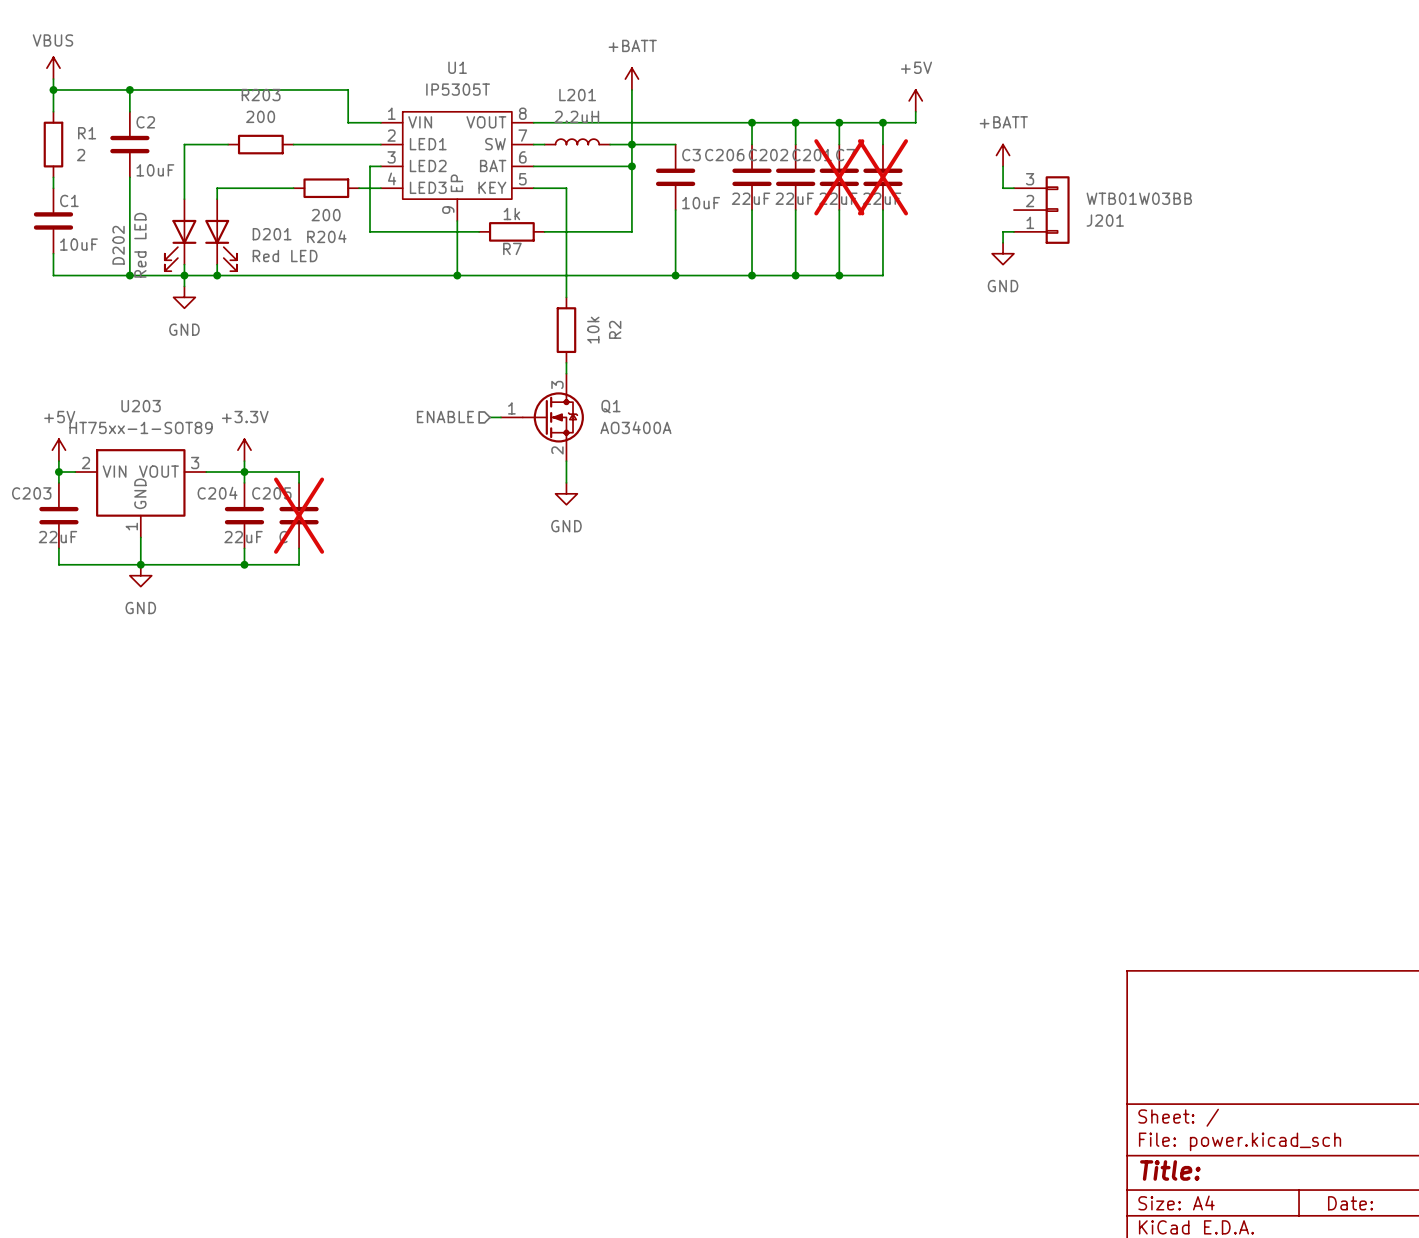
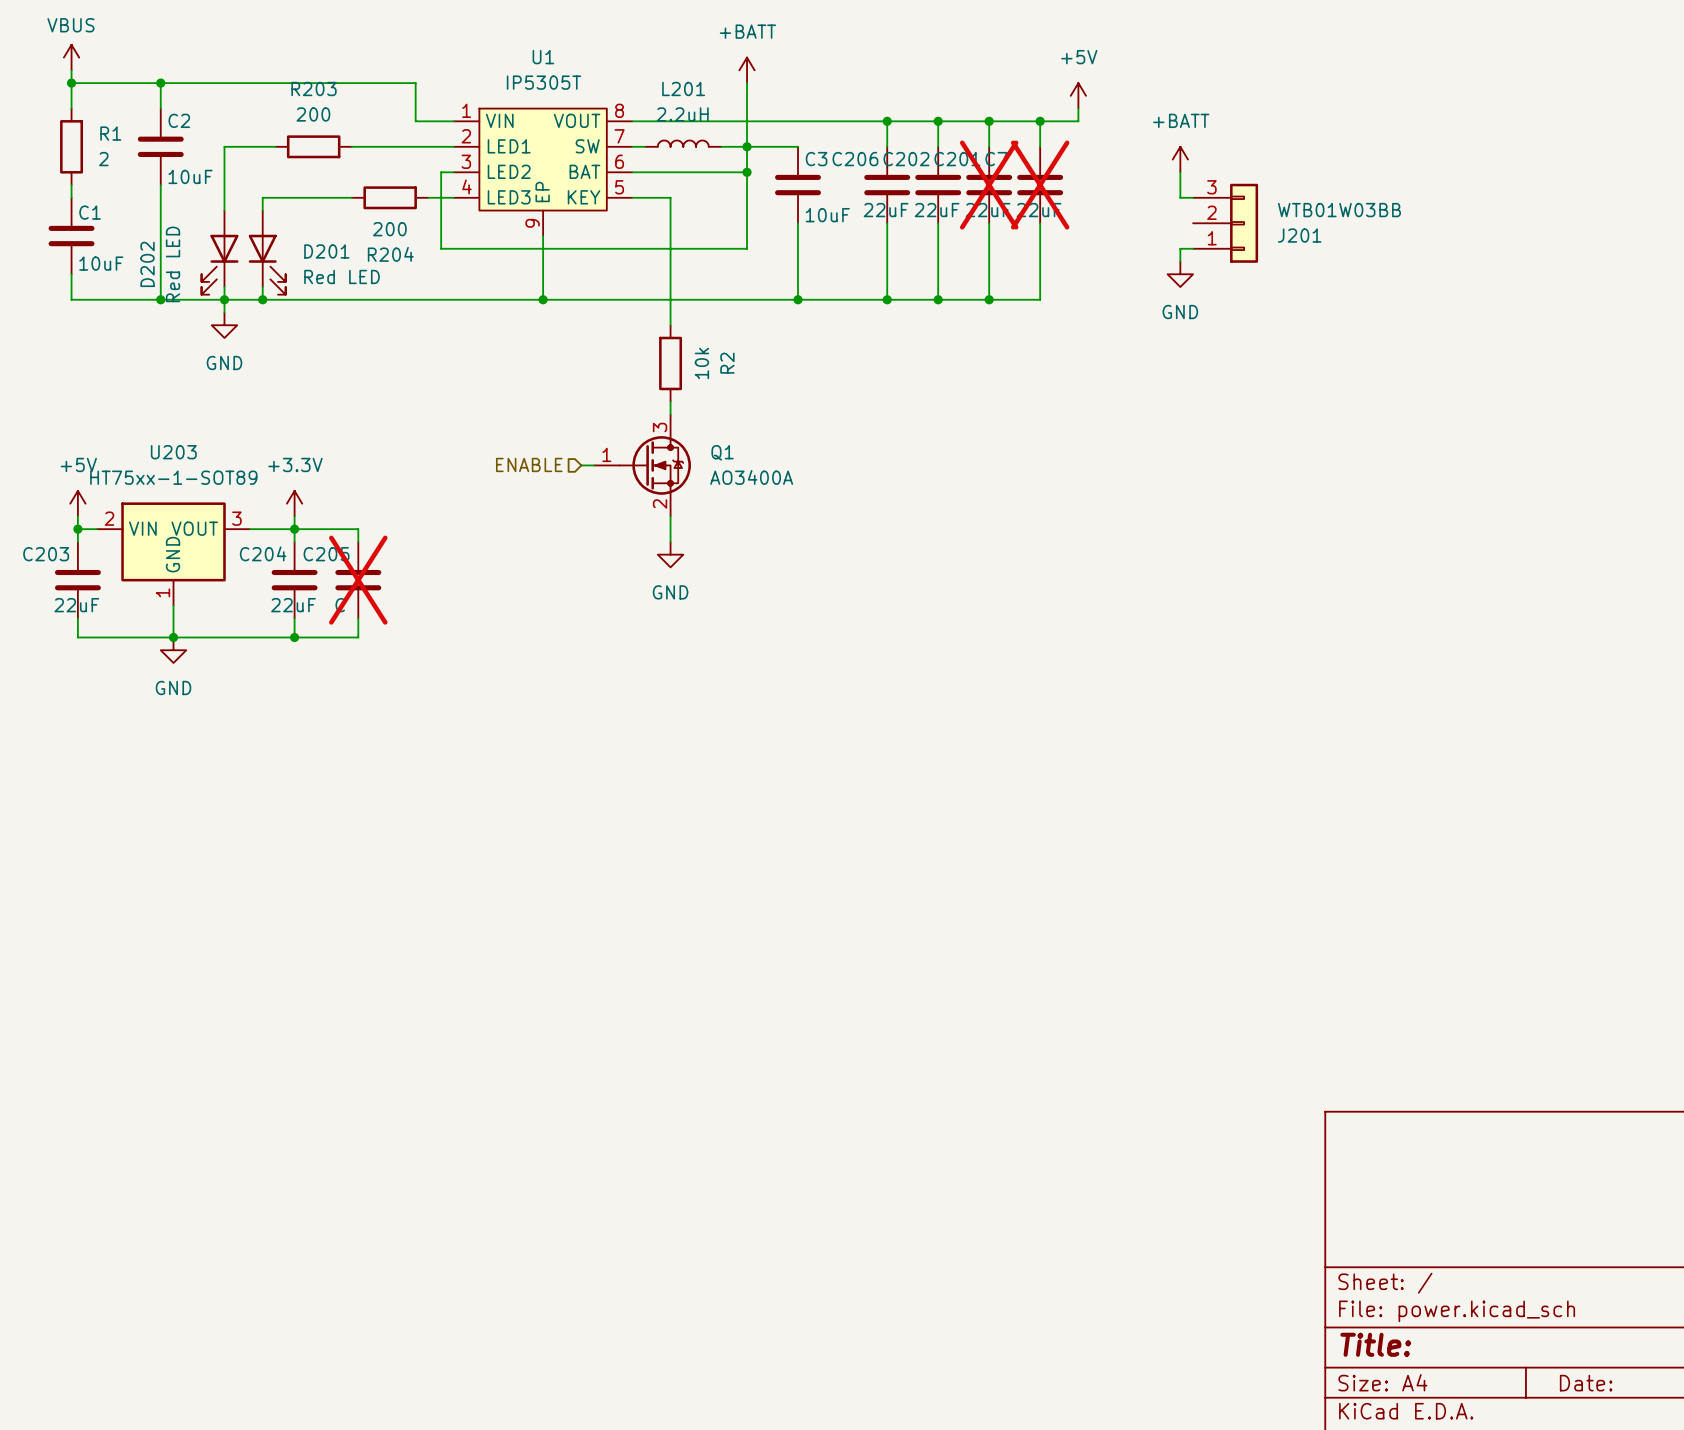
wire: none -> (568, 248) (645, 248)
R7: 1k (511, 231) -> none

